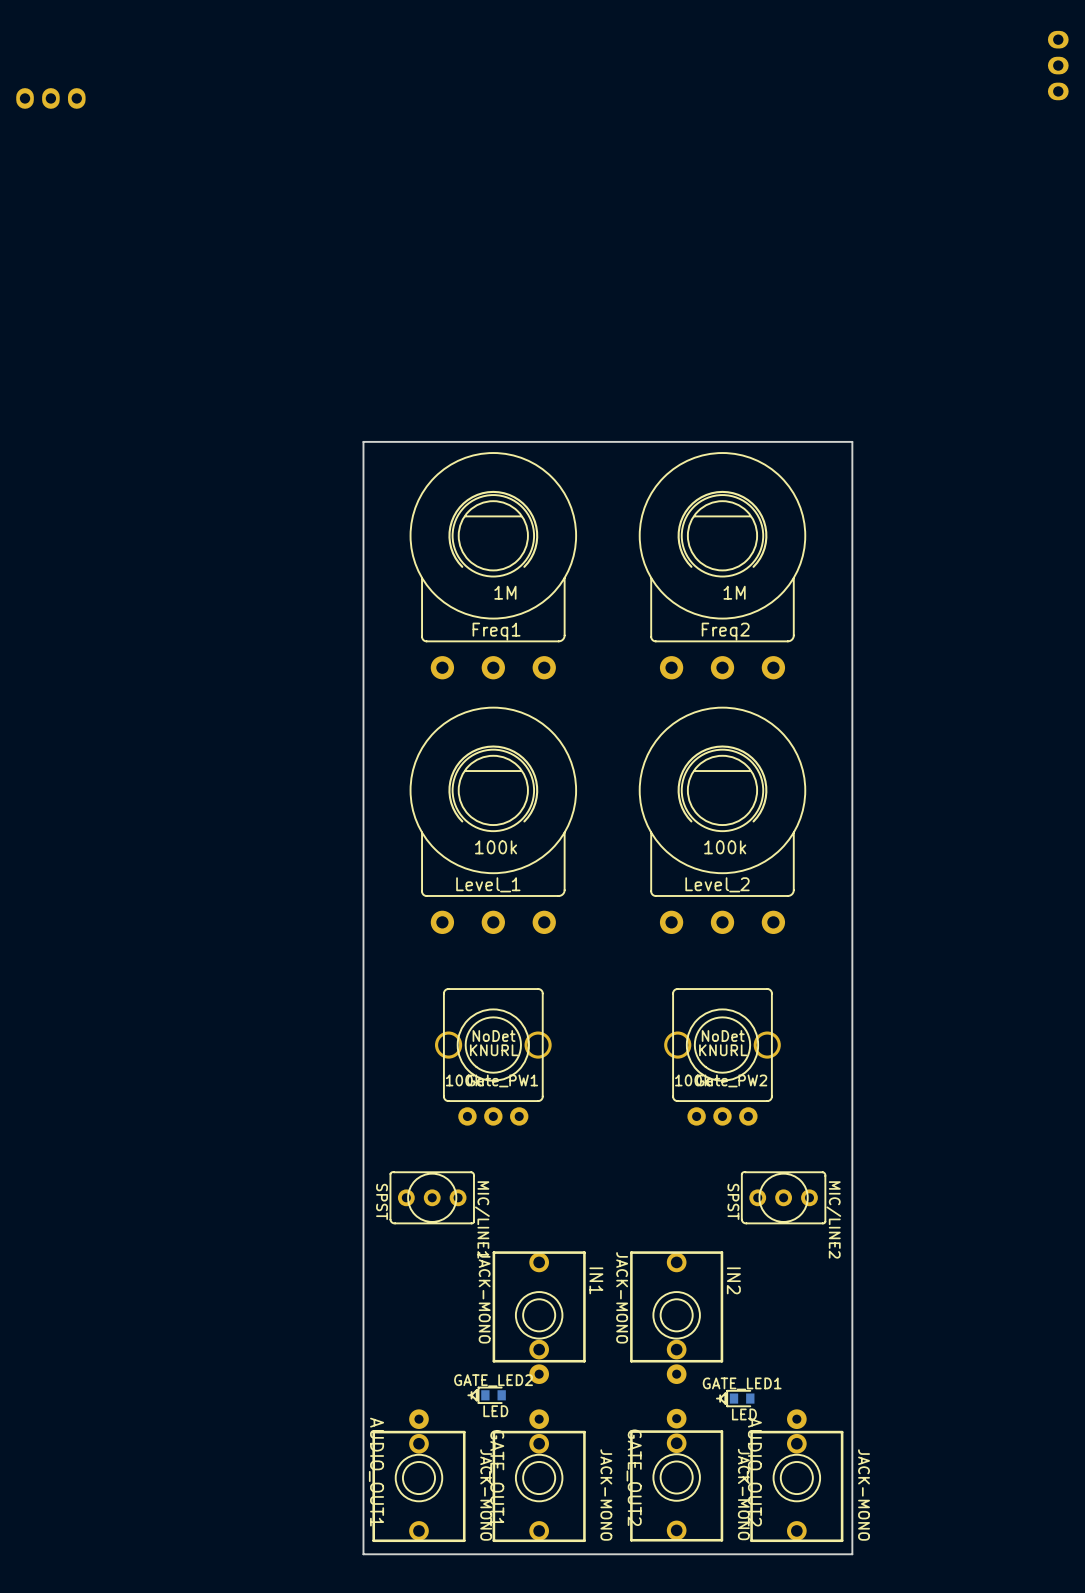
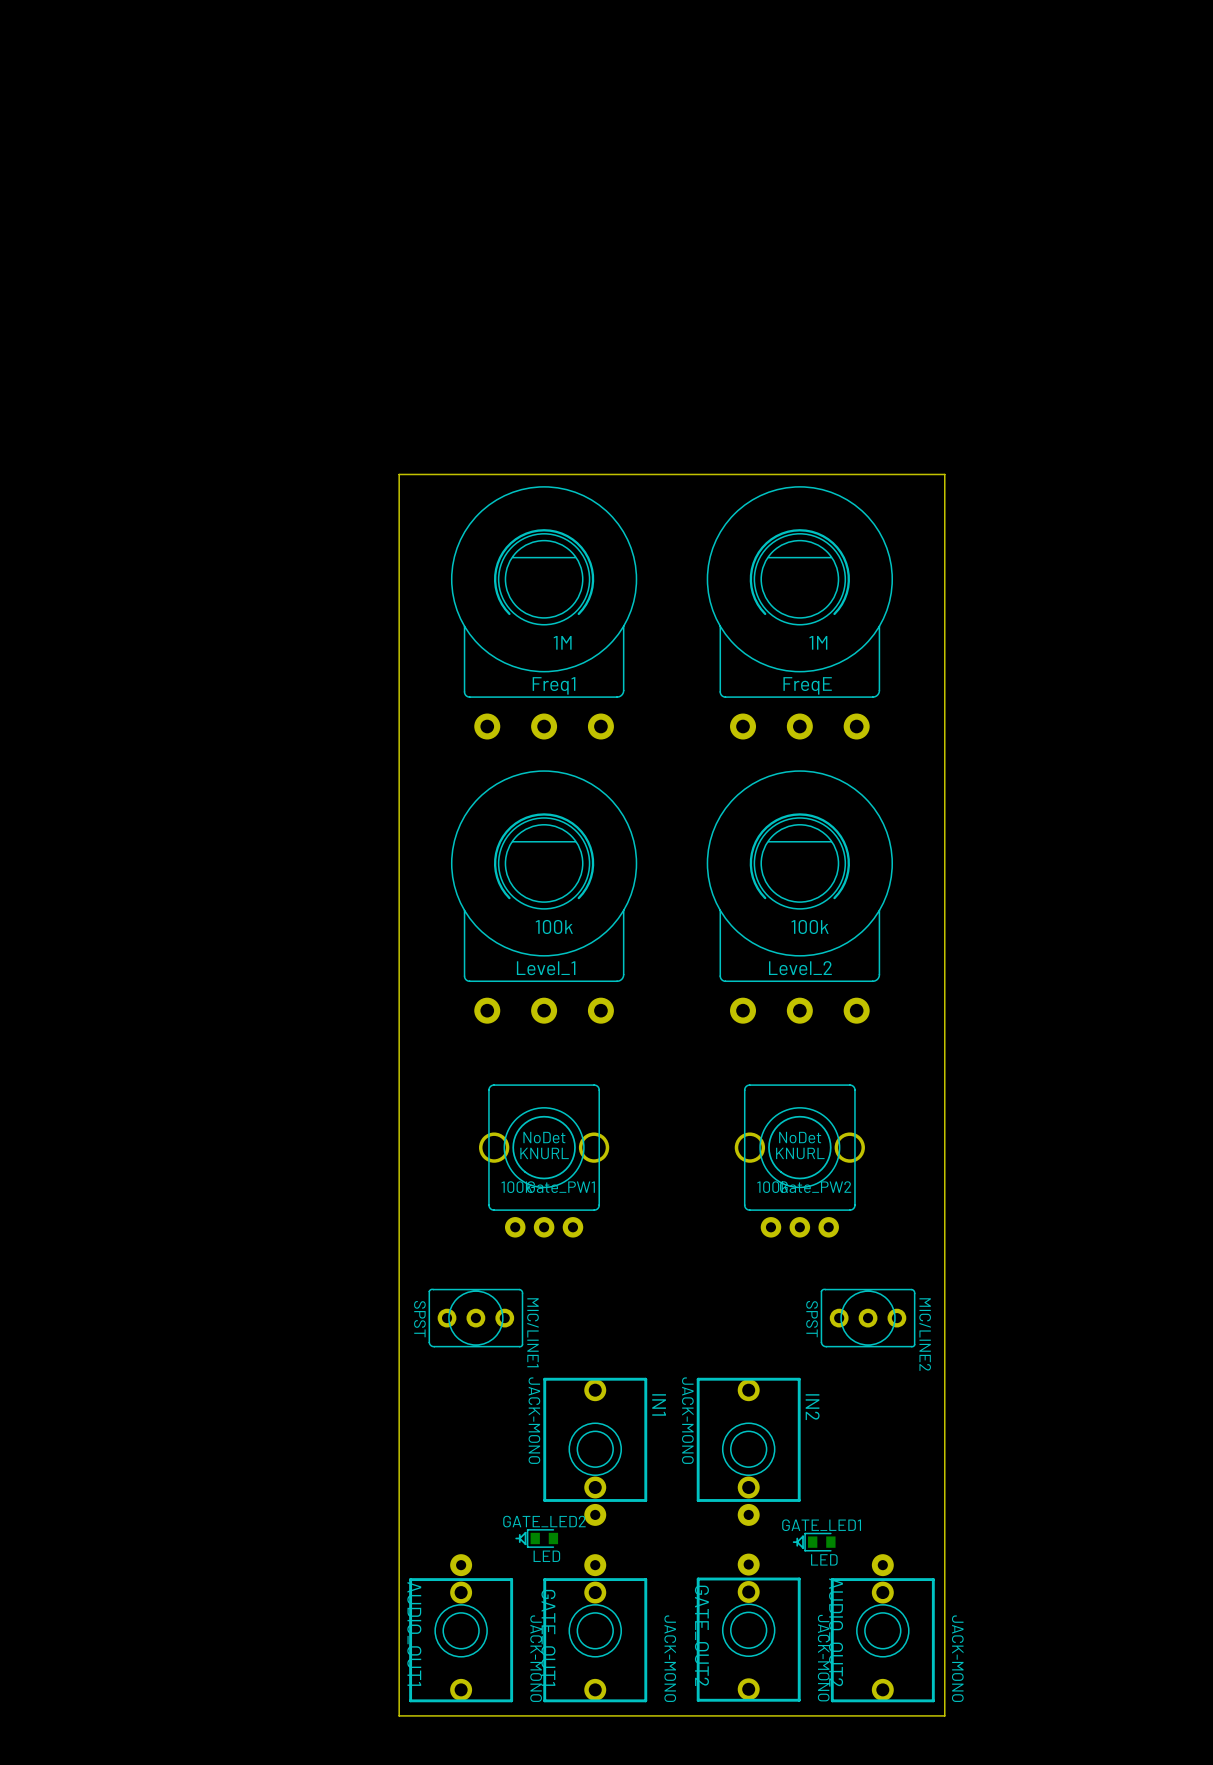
part: (1058, 65) -> none
part: (50, 98) -> none
Freq2 name: Freq2 (725, 631) -> FreqE (807, 685)

